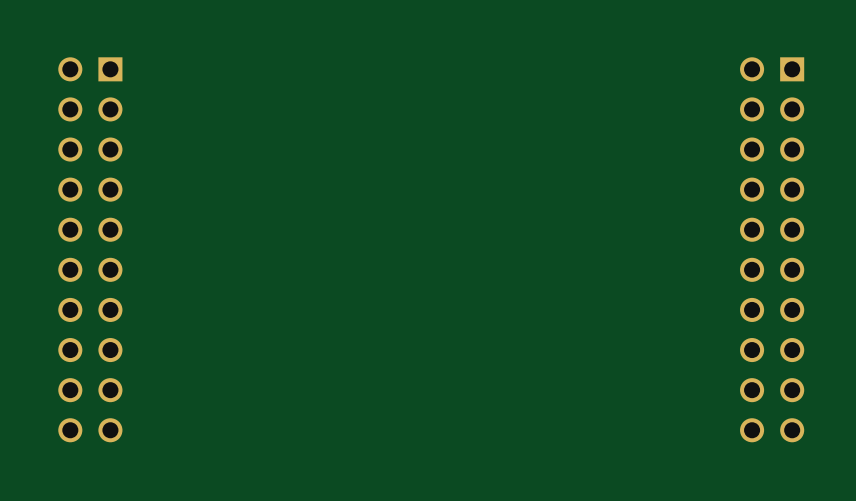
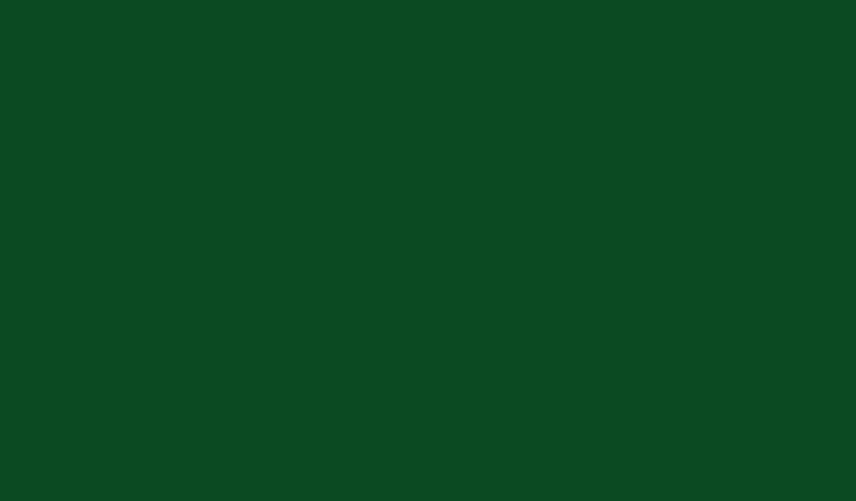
part: (90, 249) -> none
part: (772, 249) -> none

